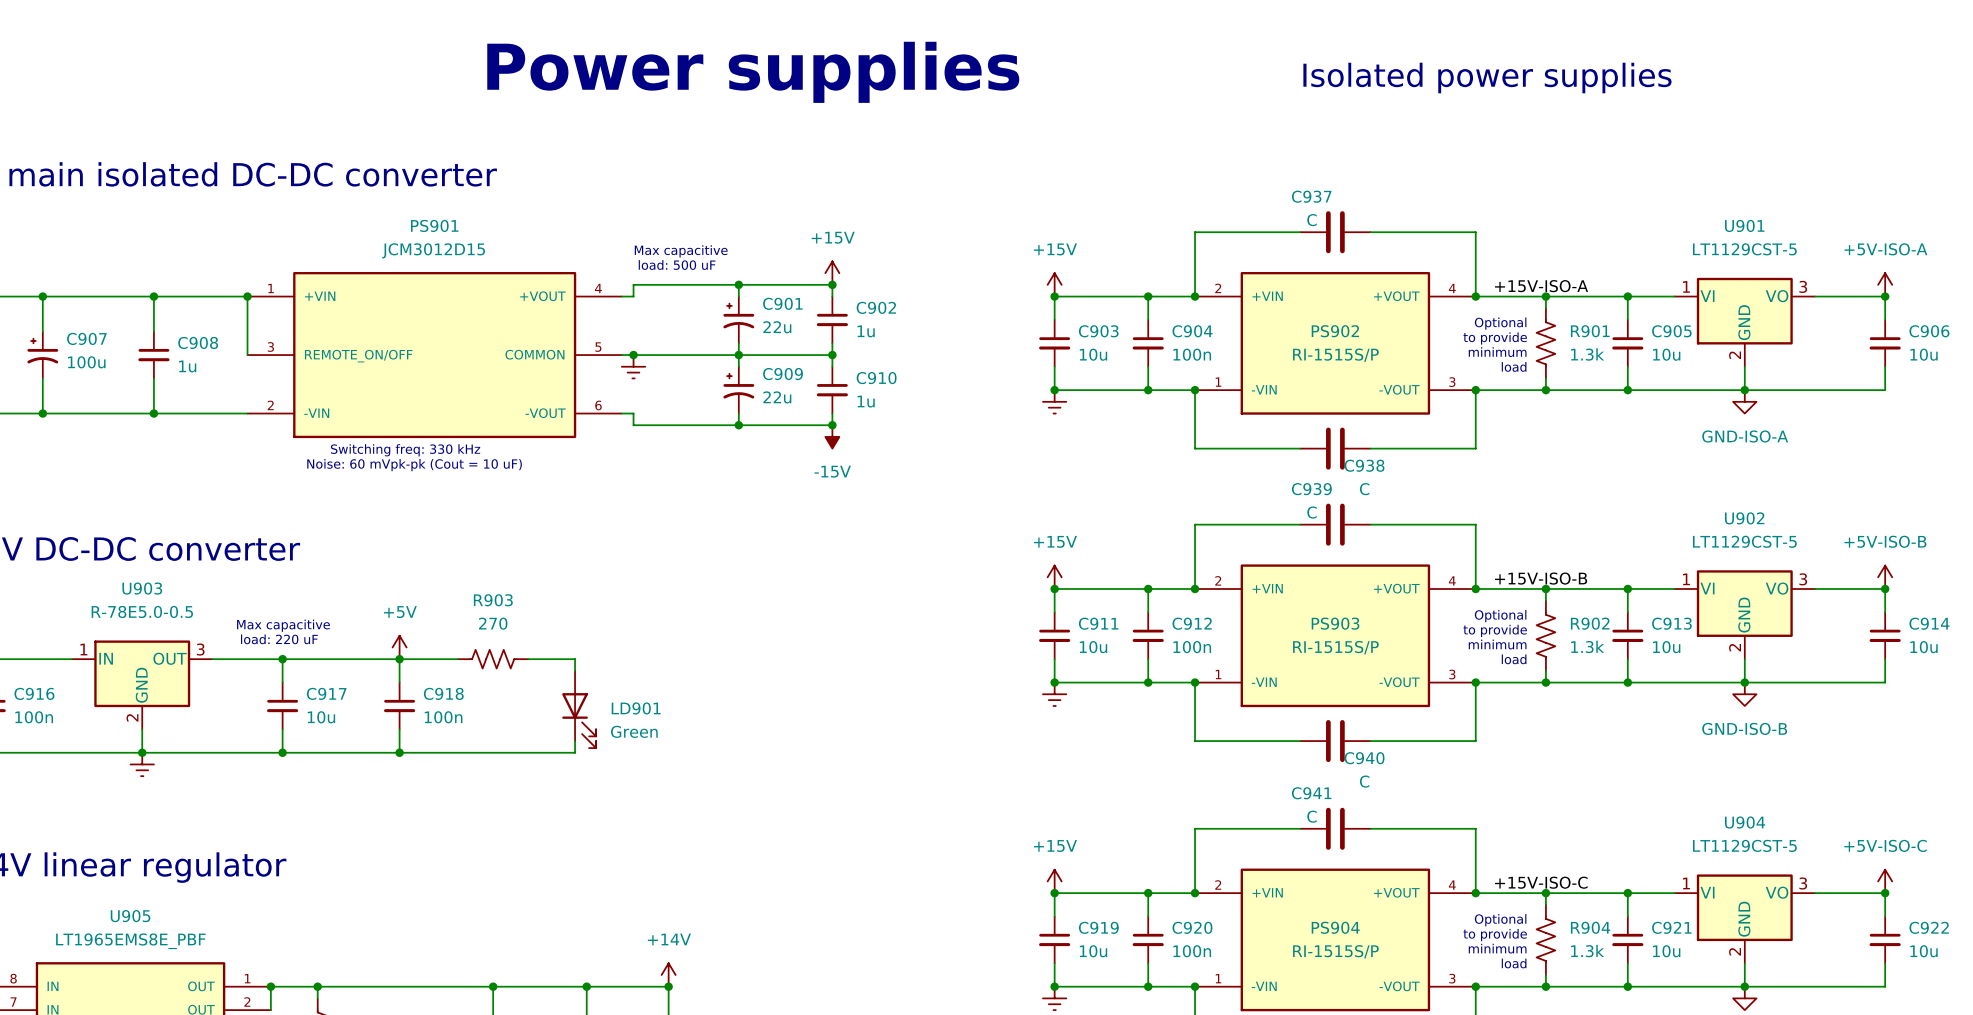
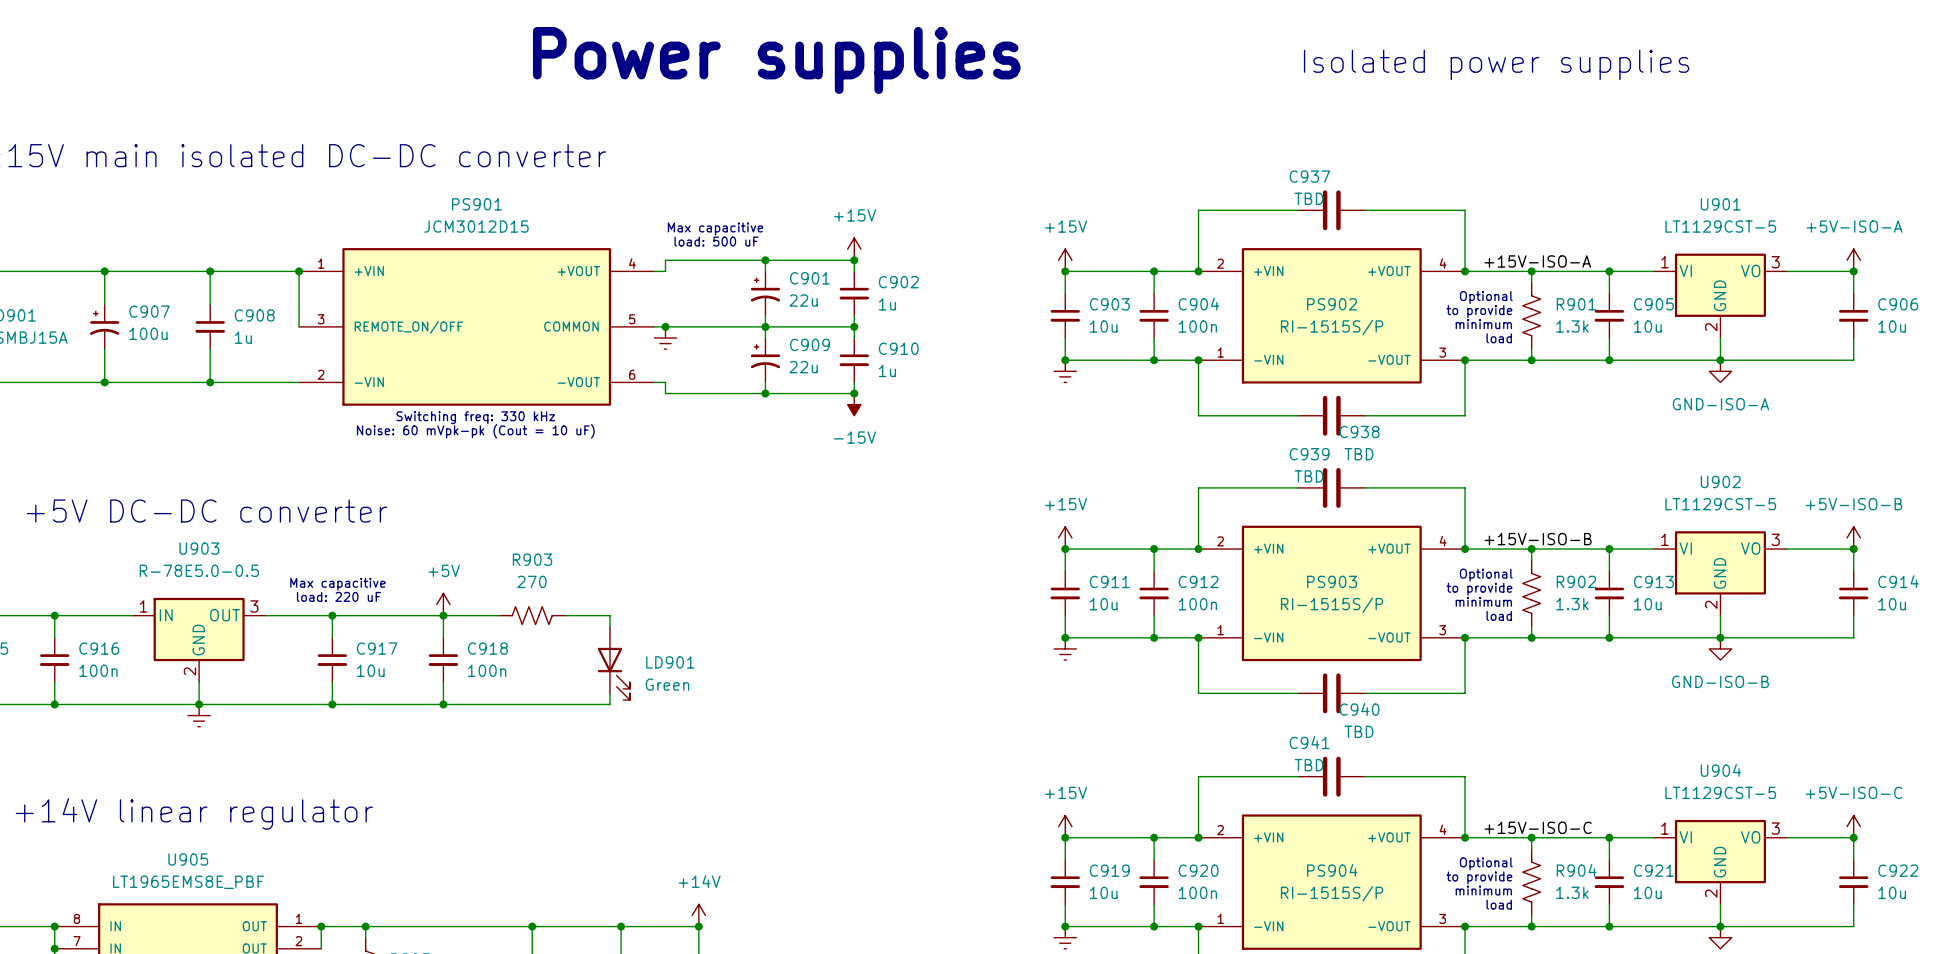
C937 value: C (1312, 220) -> TBD (1309, 198)
C938 value: C (1364, 489) -> TBD (1359, 454)
C939 value: C (1312, 512) -> TBD (1309, 476)
C940 value: C (1364, 781) -> TBD (1359, 731)
C941 value: C (1312, 816) -> TBD (1309, 765)

